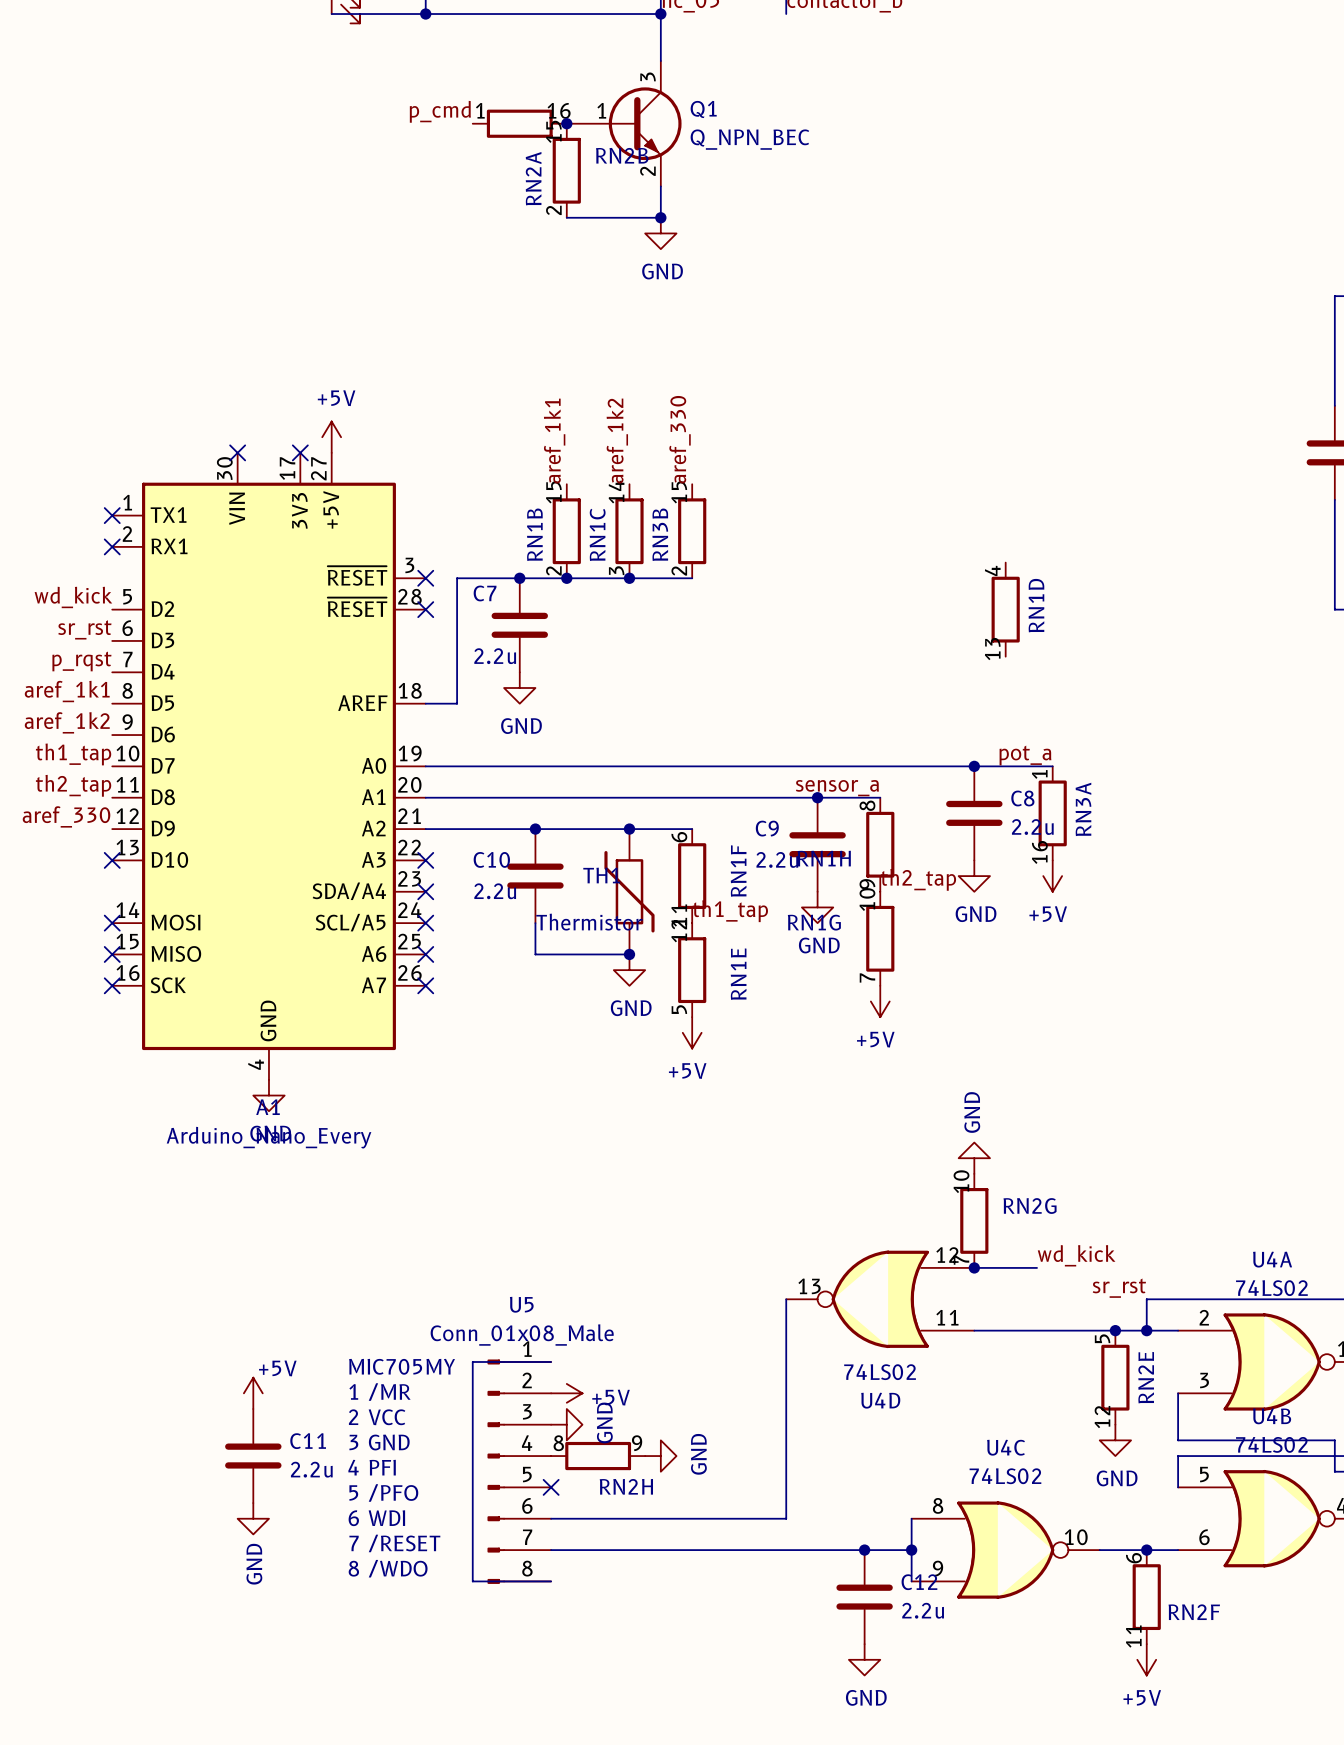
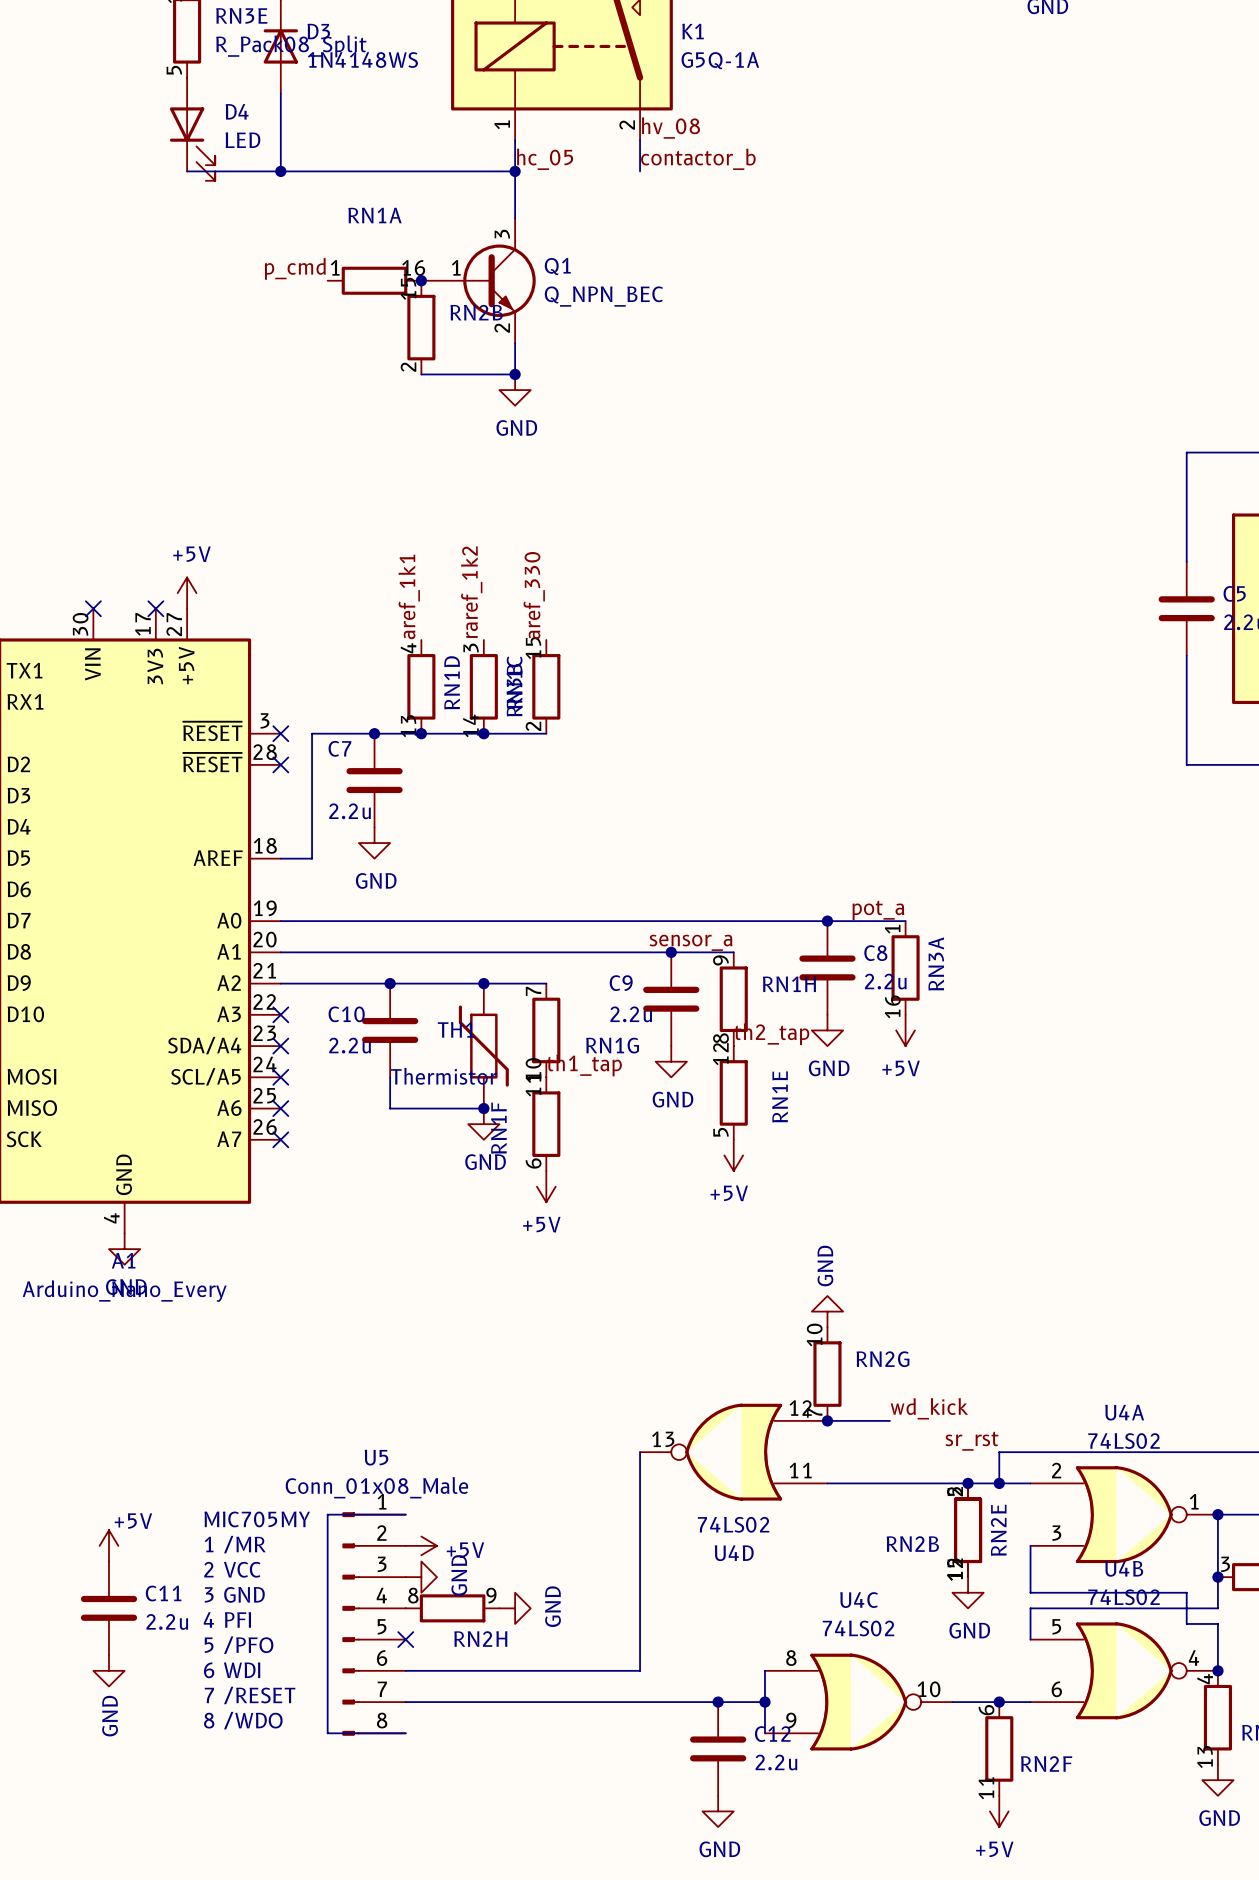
RN2A name: RN2A (533, 178) -> RN1A (374, 215)
label: aref_1k2 (617, 441) -> raref_1k2 (471, 592)
RN1B: (566, 531) -> none
RN1C rotation: 0° (629, 531) -> 180° (483, 686)
RN1D position: (1005, 609) -> (421, 686)
RN1H rotation: 0° (880, 844) -> 180° (733, 999)
RN1F rotation: 0° (692, 876) -> 180° (546, 1124)
RN1F position: (692, 876) -> (546, 1124)
RN1G rotation: 0° (880, 938) -> 180° (546, 1030)
RN1G position: (880, 938) -> (546, 1030)
RN1E position: (692, 970) -> (733, 1092)
RN2B: none -> (968, 1530)

